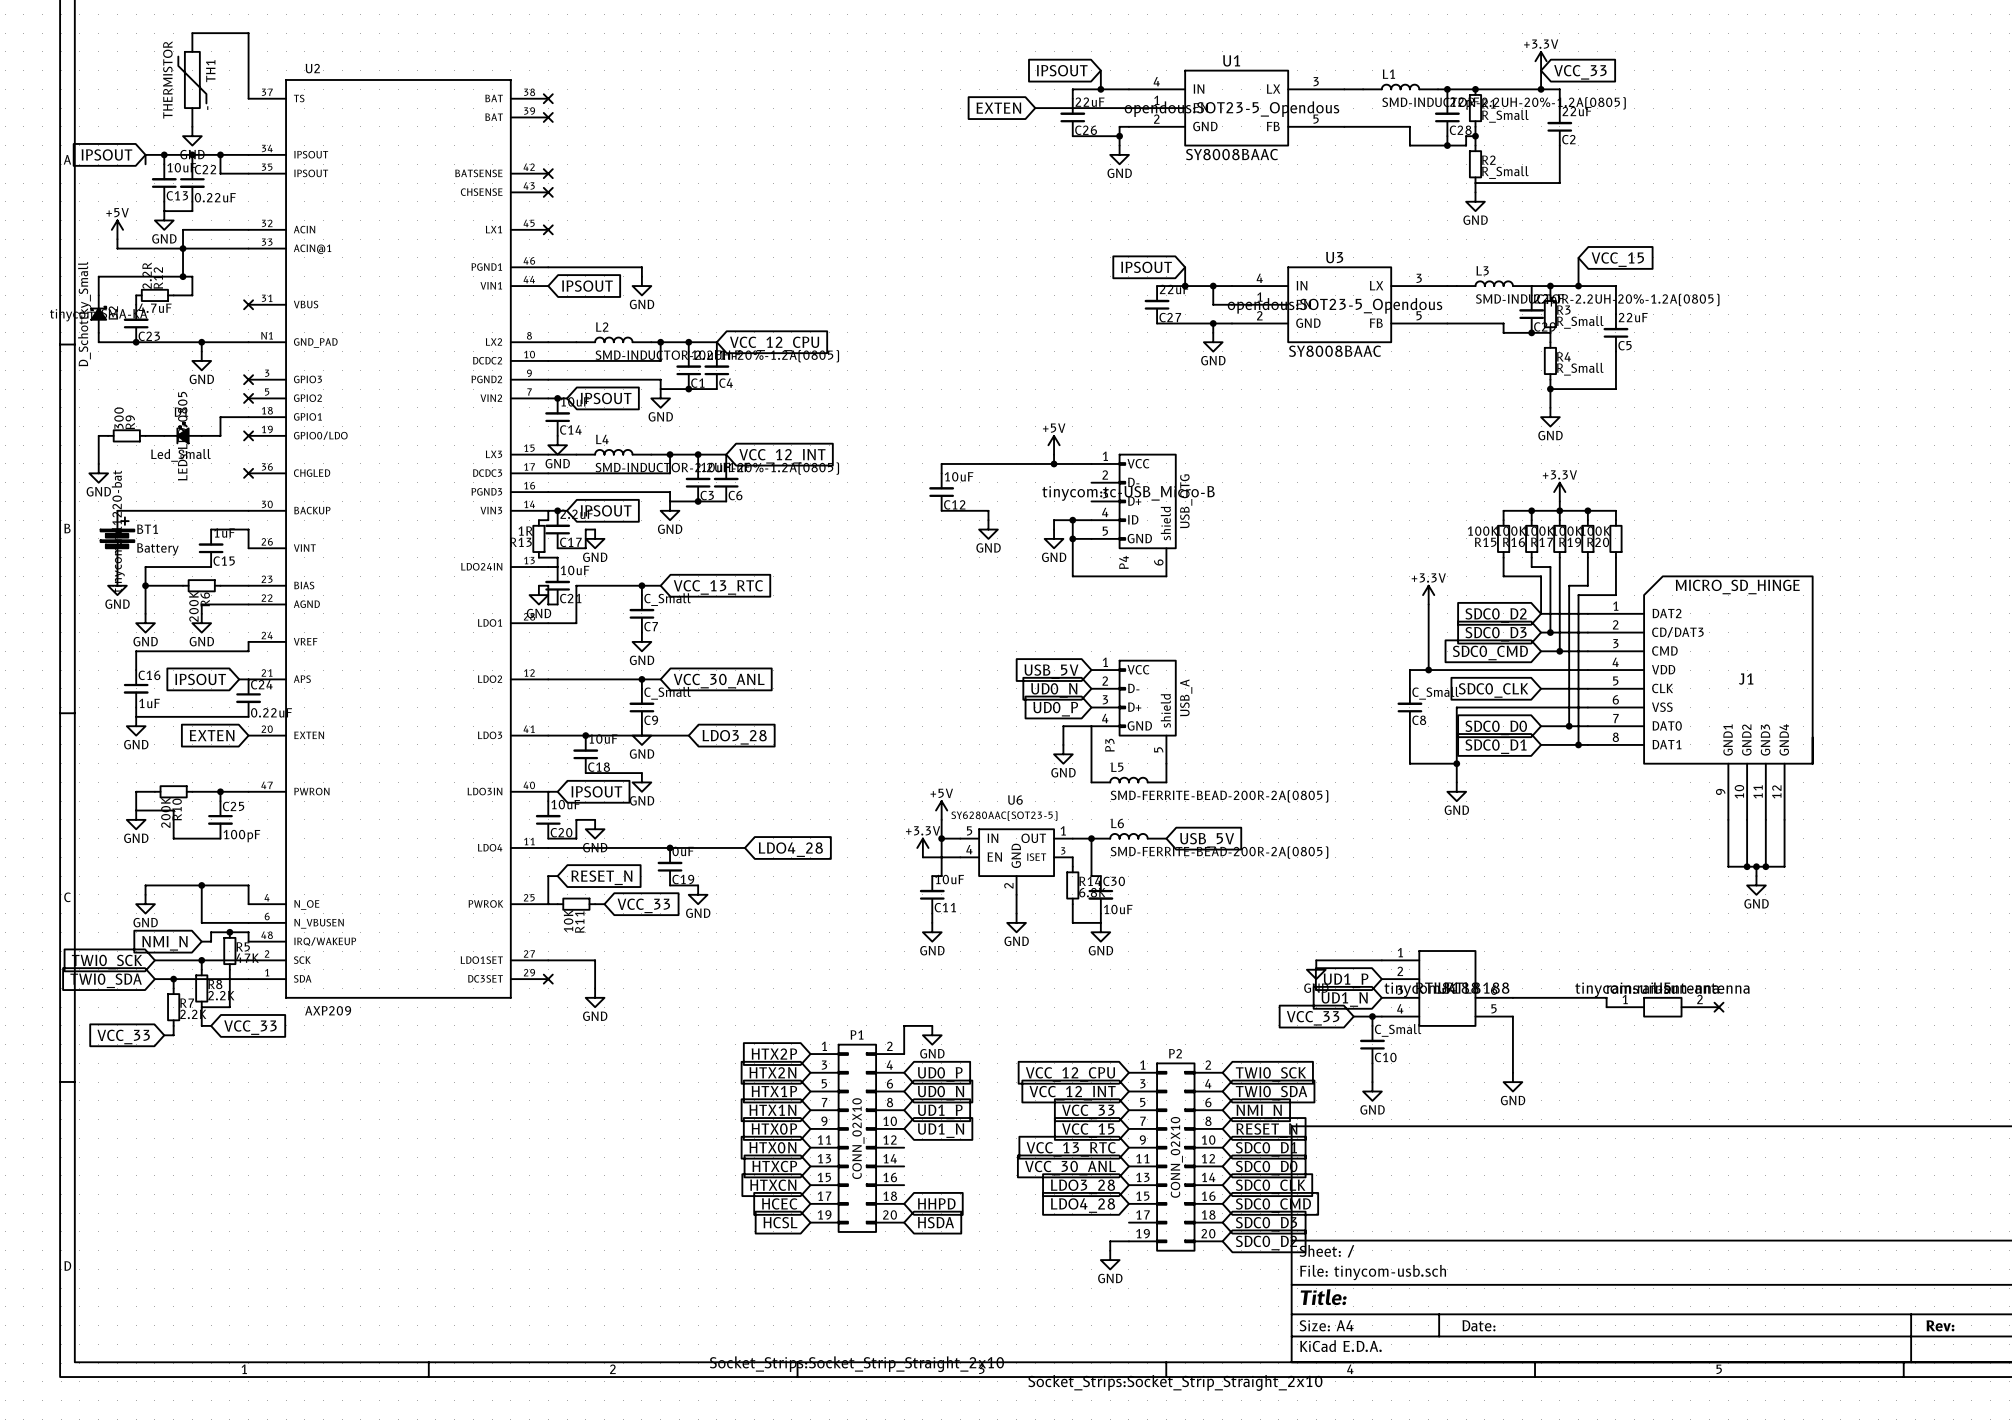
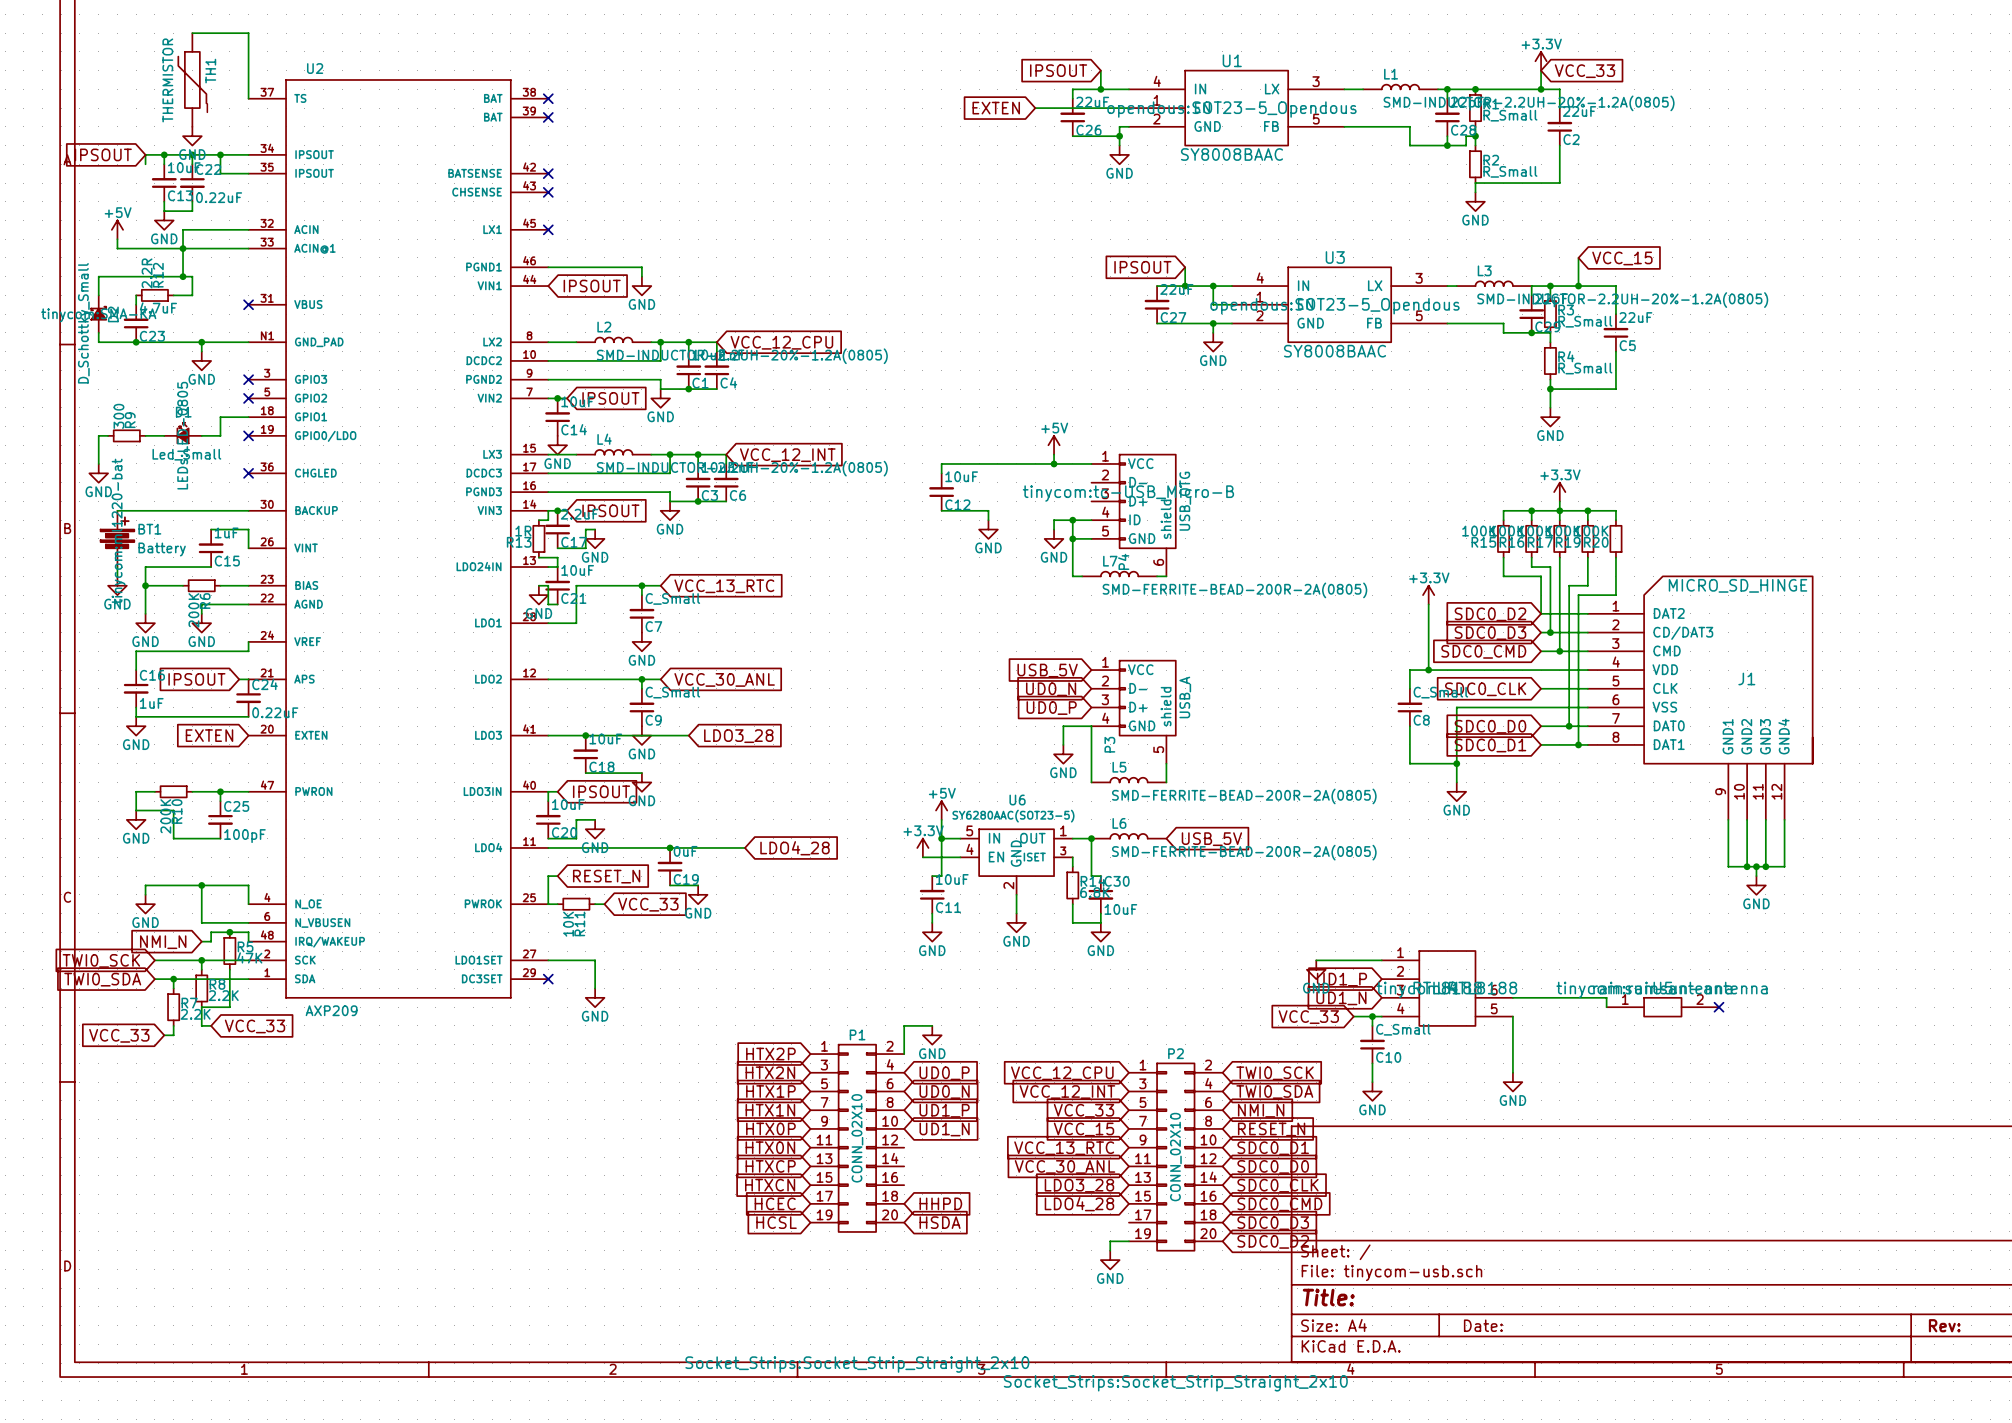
L7: none -> SMD-FERRITE-BEAD-200R-2A(0805) (1119, 574)

